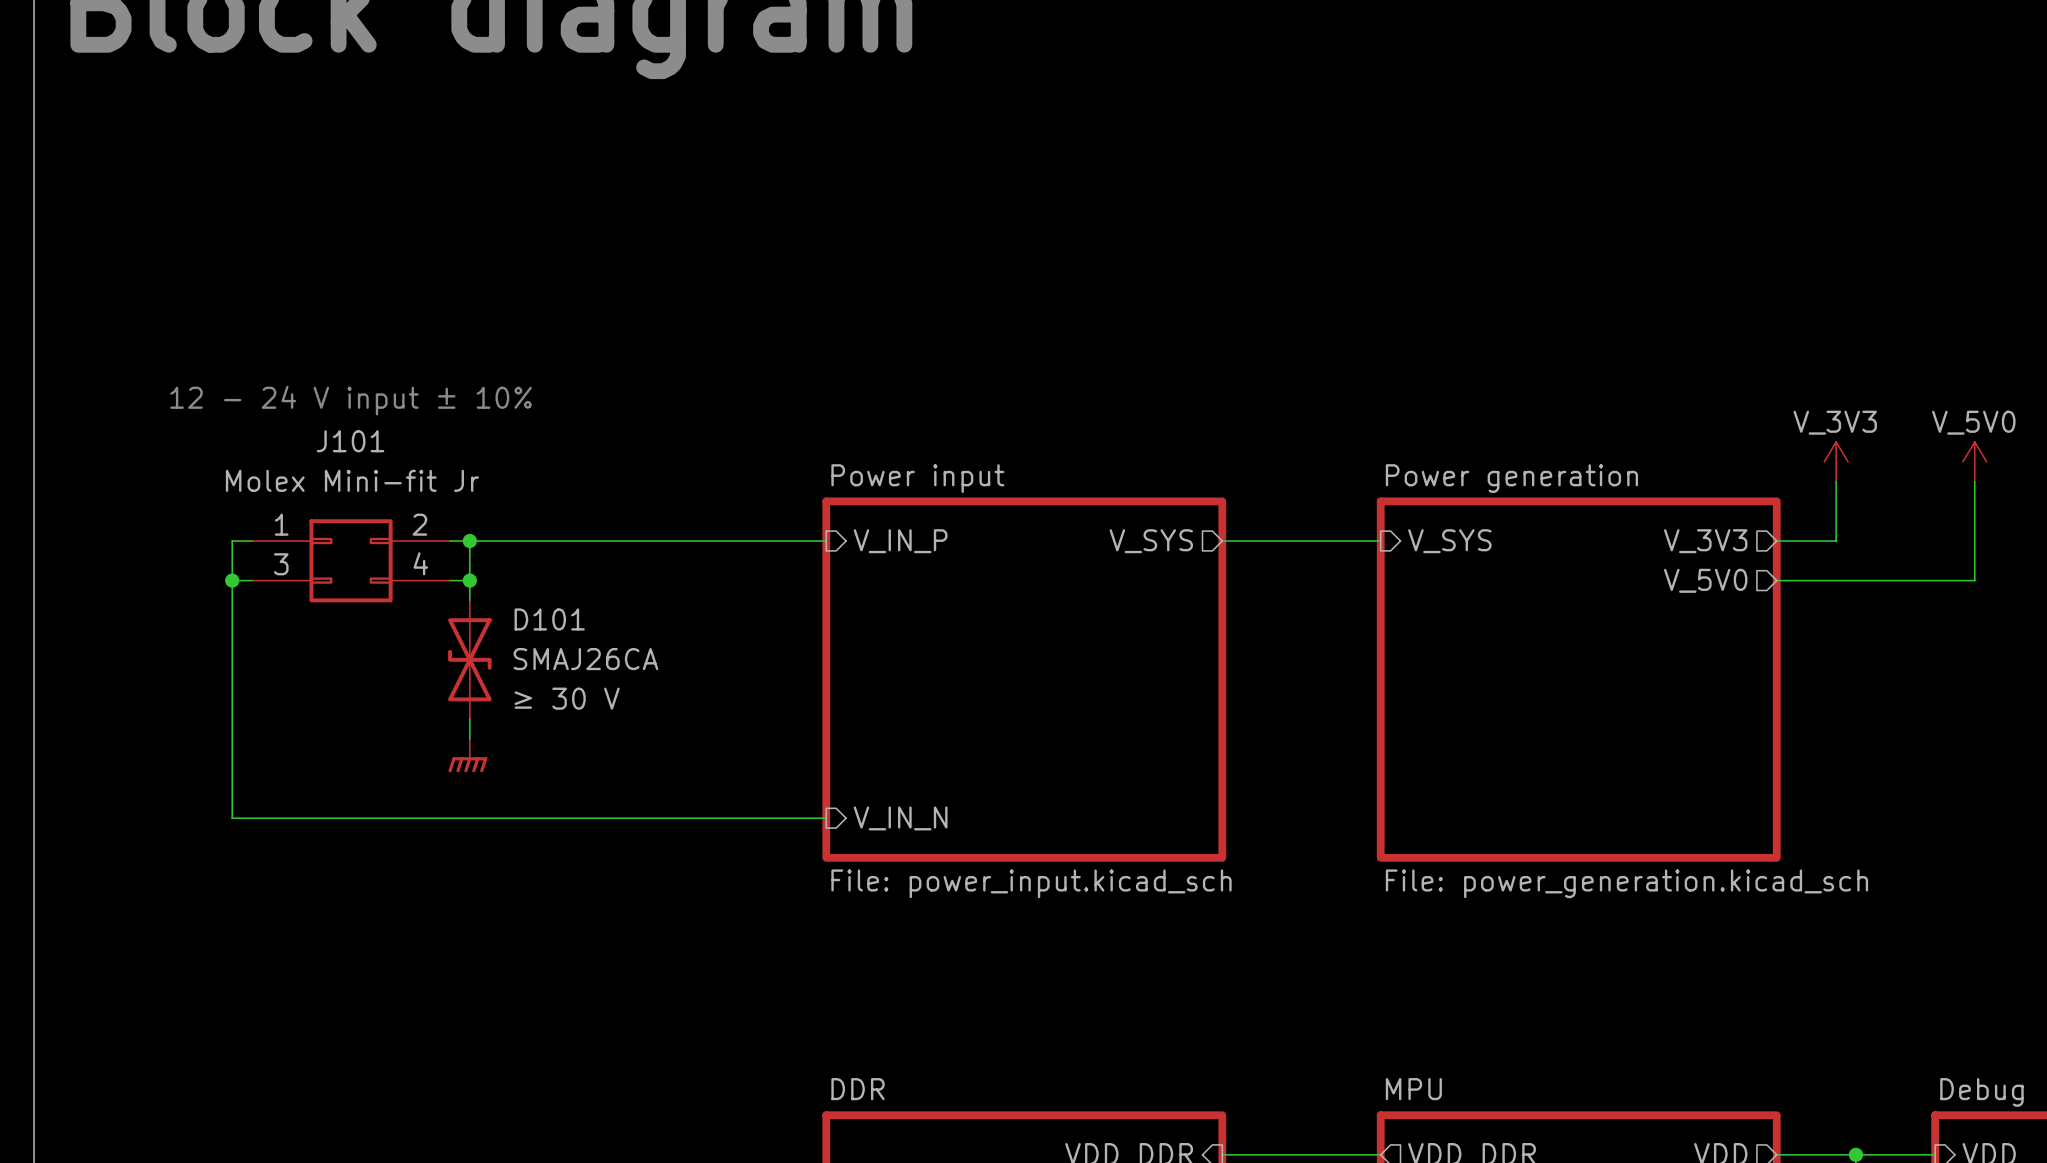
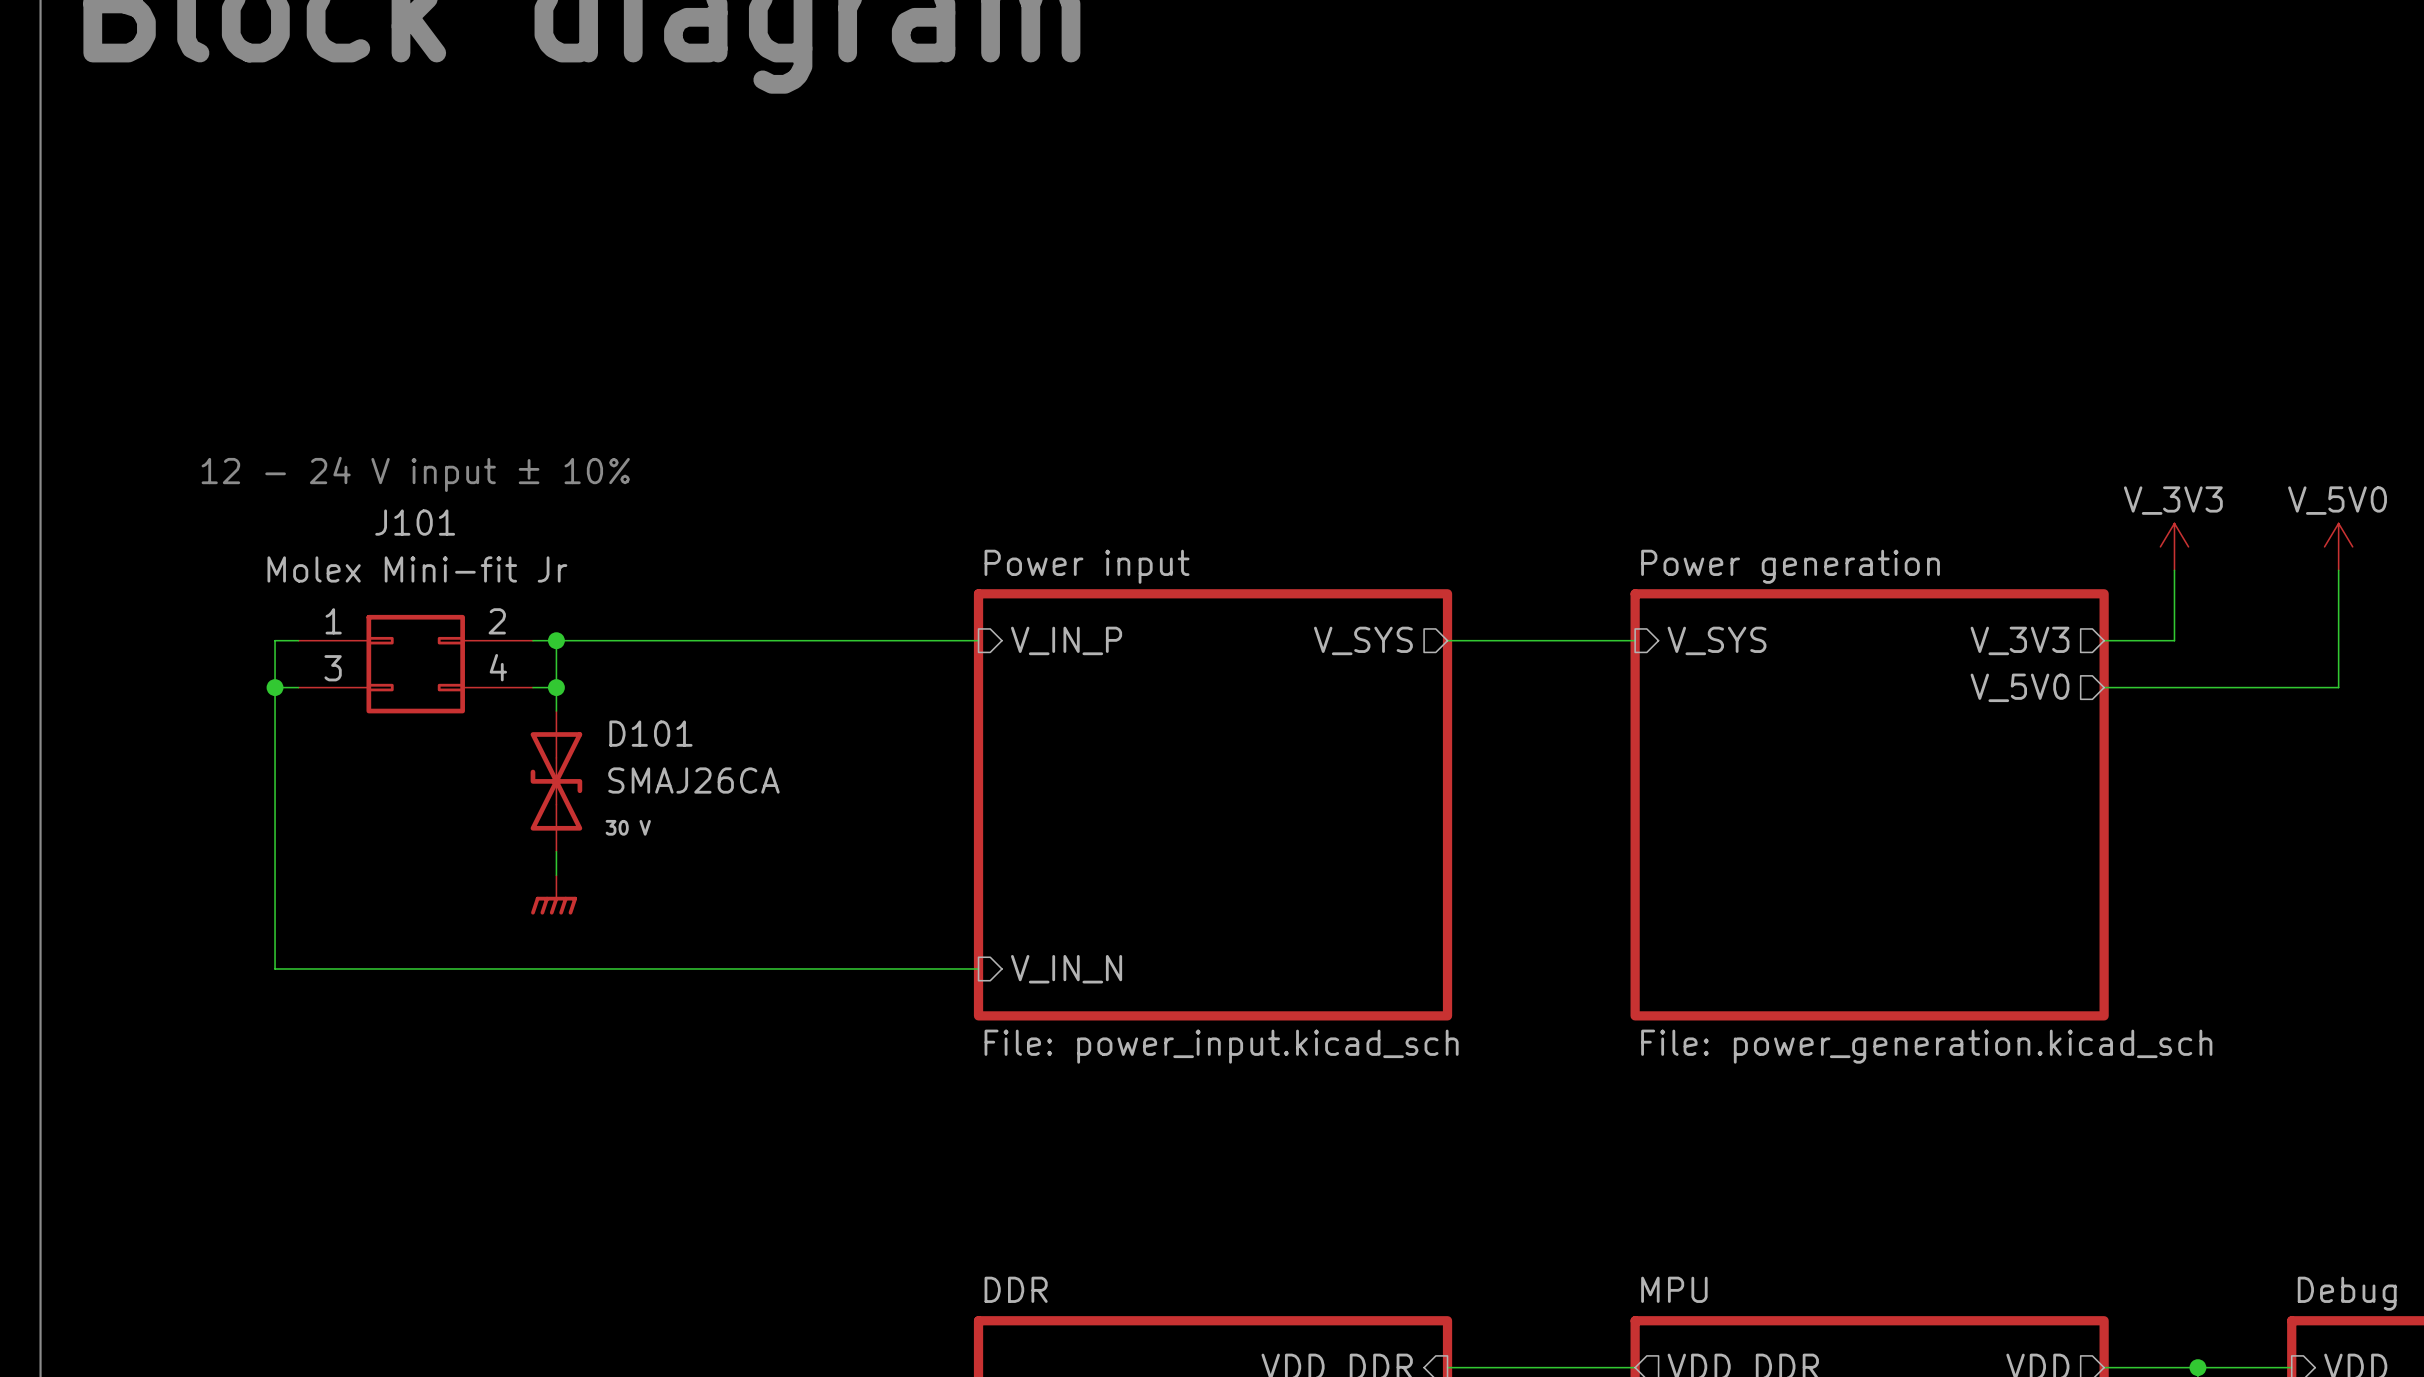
D101 text: ≥ 30 V (567, 698) -> 30 V (628, 827)

